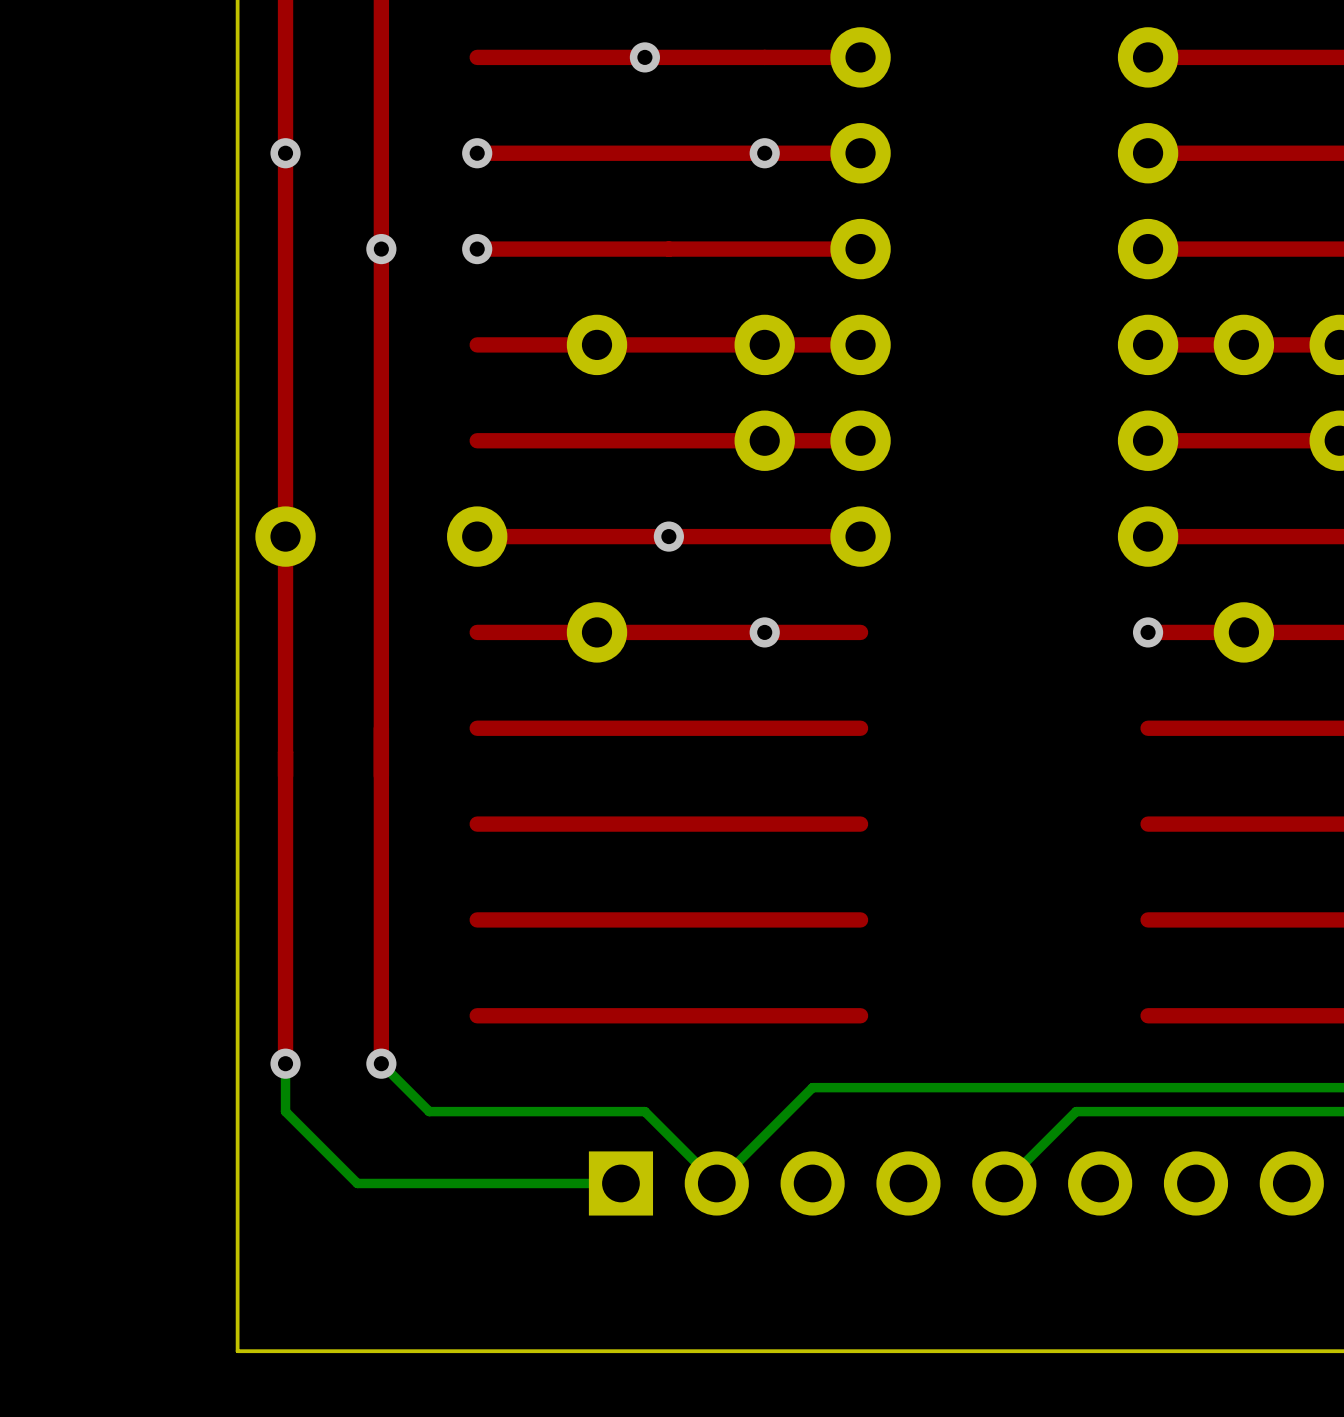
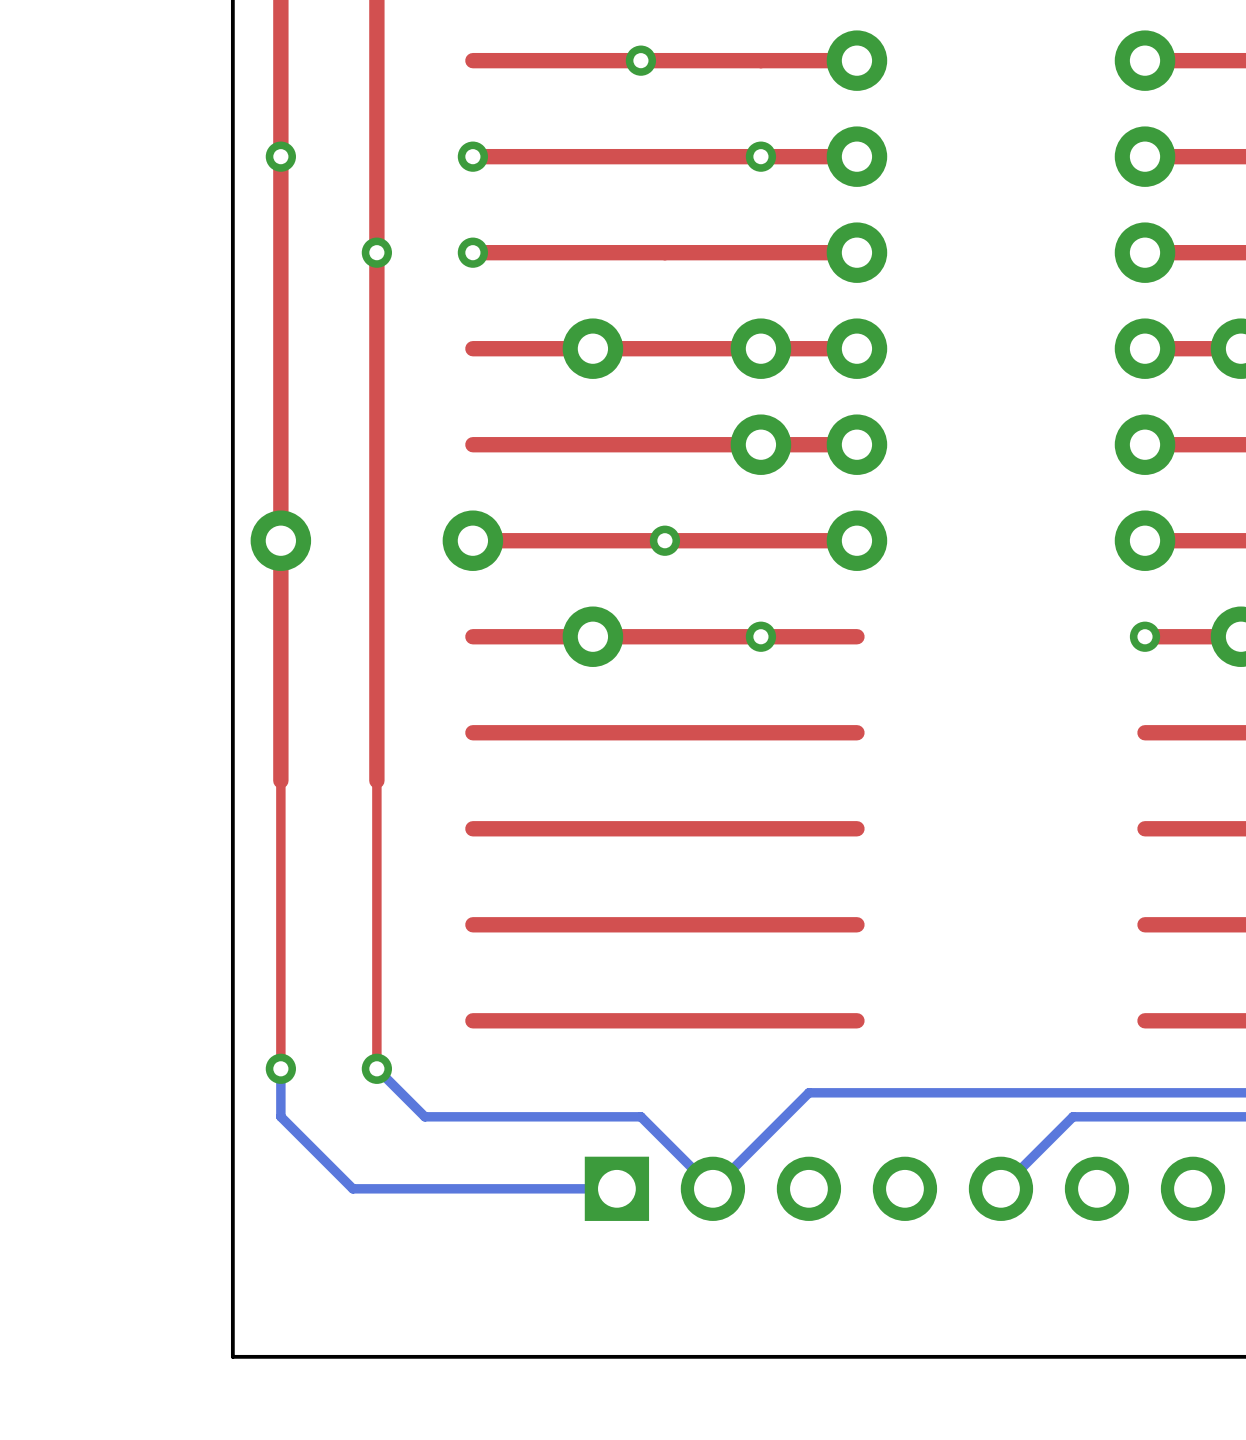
top track width: thick (285, 776) (285, 1063) -> thin (280, 780) (280, 1068)
top track width: thick (381, 776) (381, 1063) -> thin (376, 780) (376, 1068)

